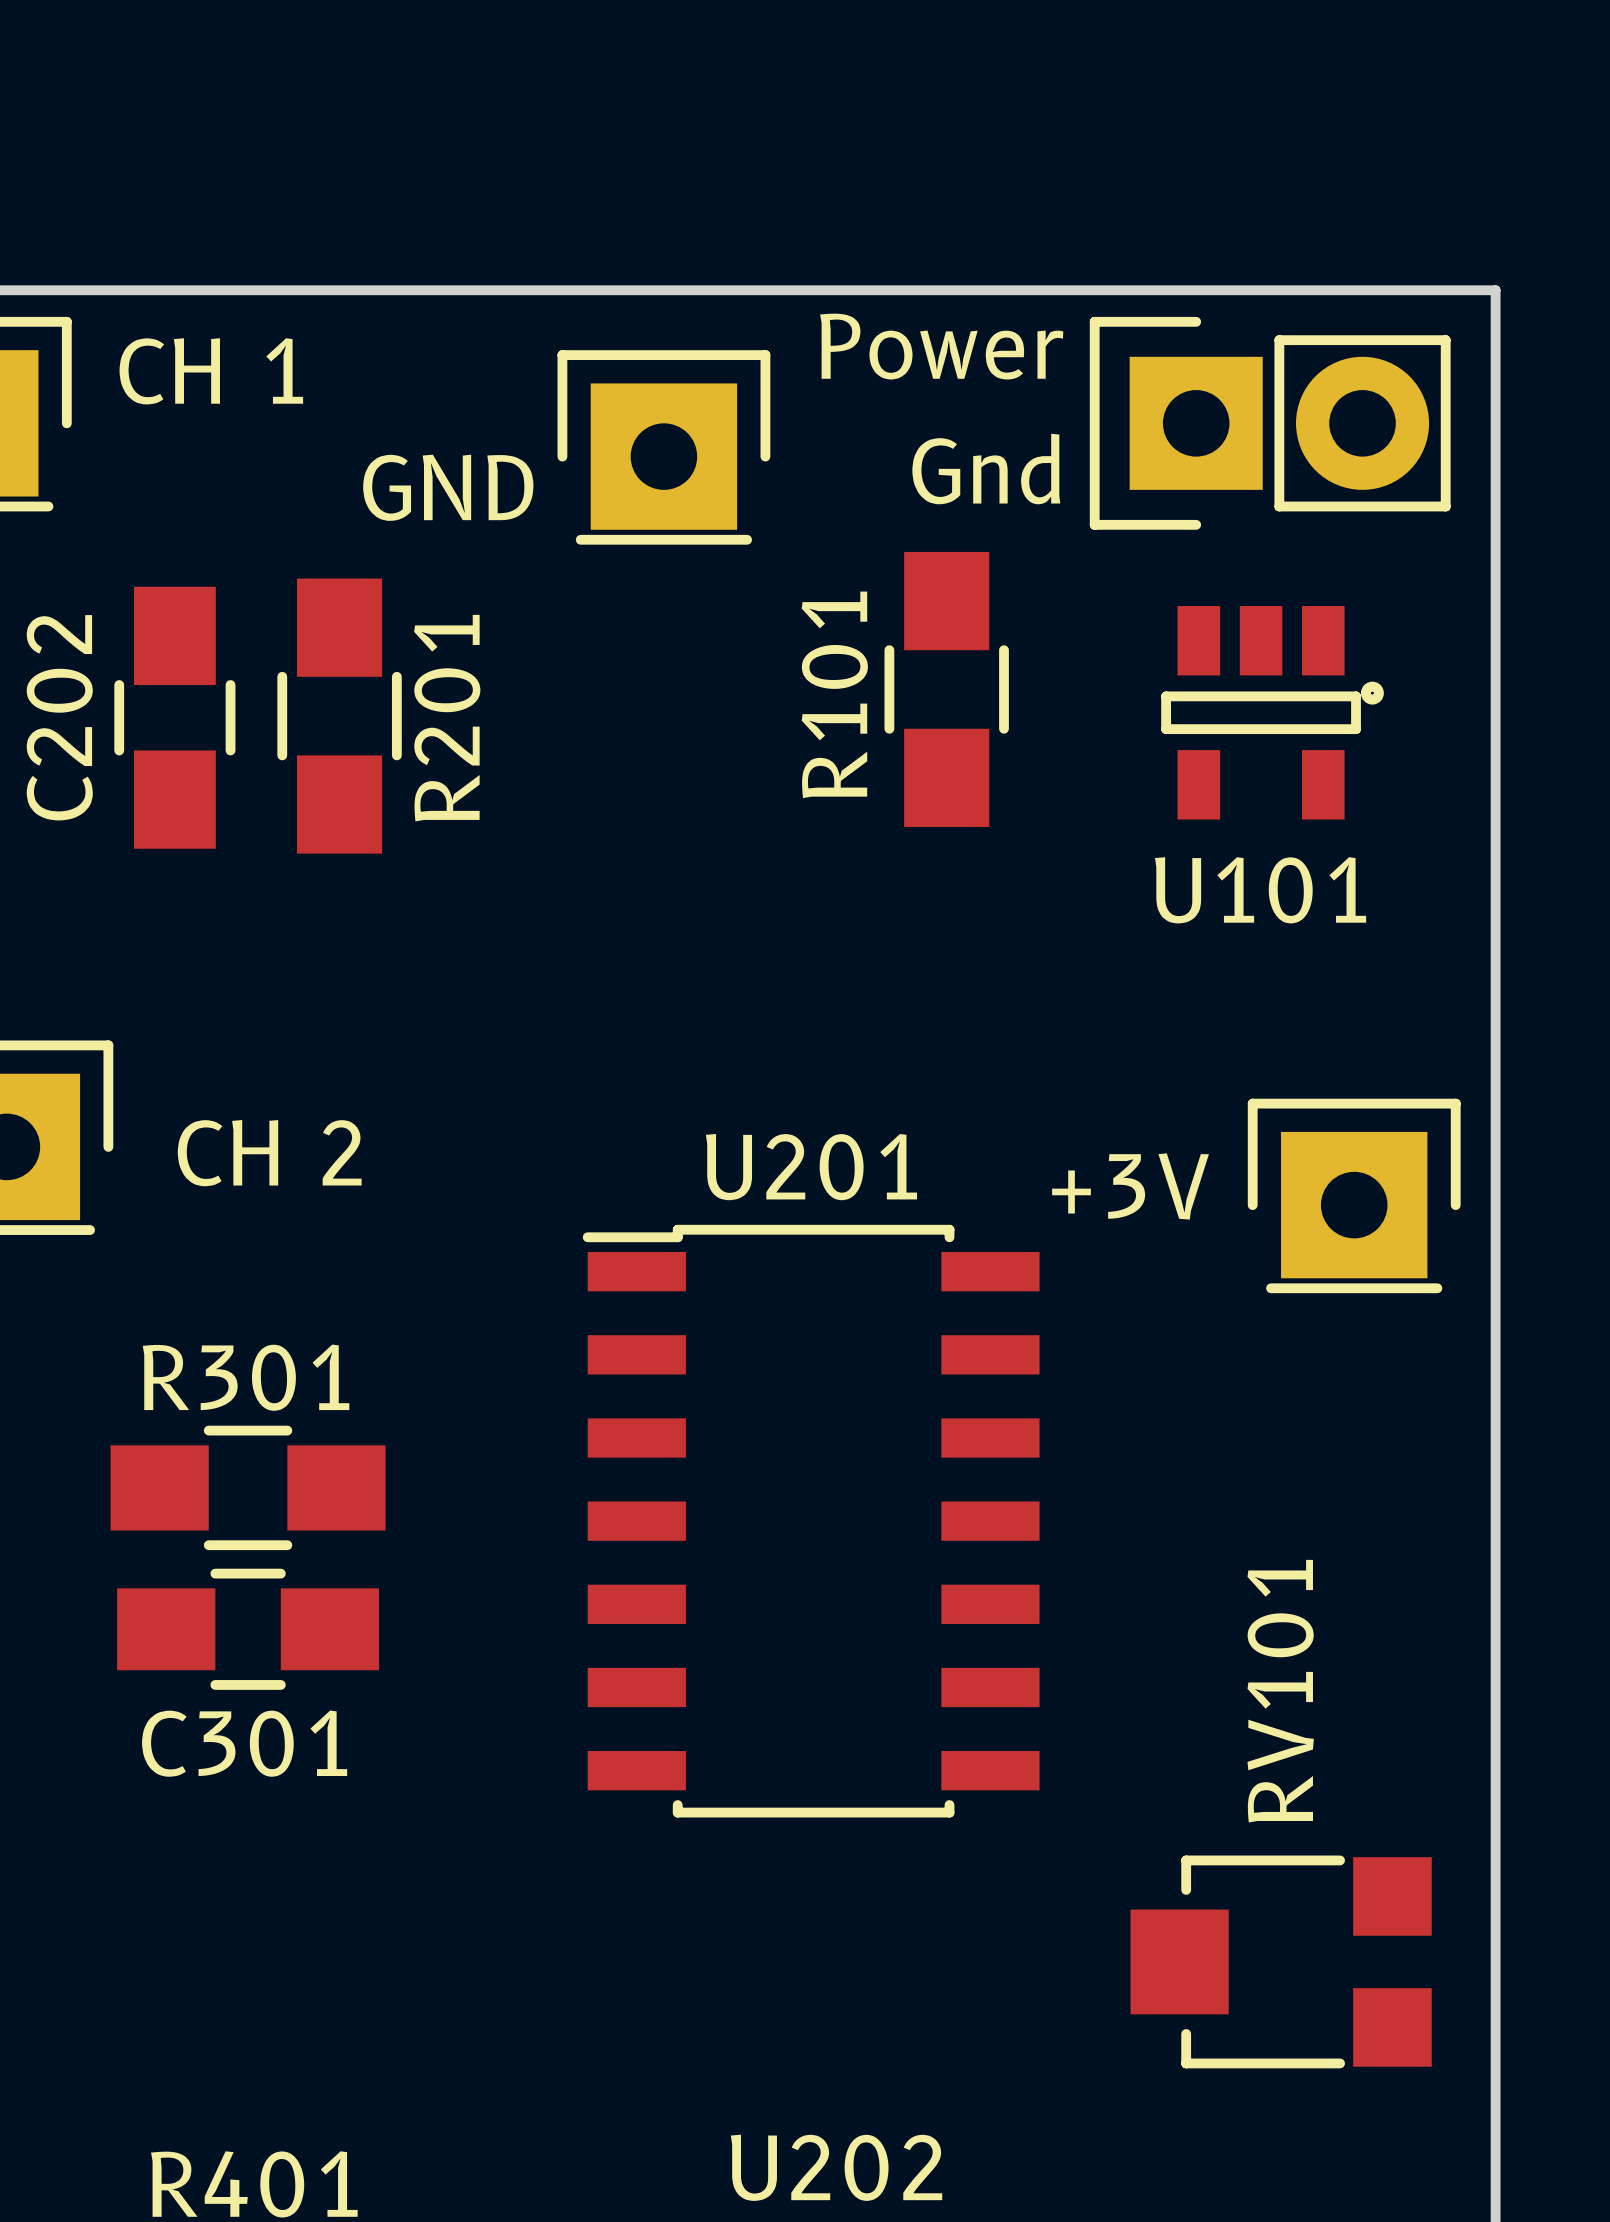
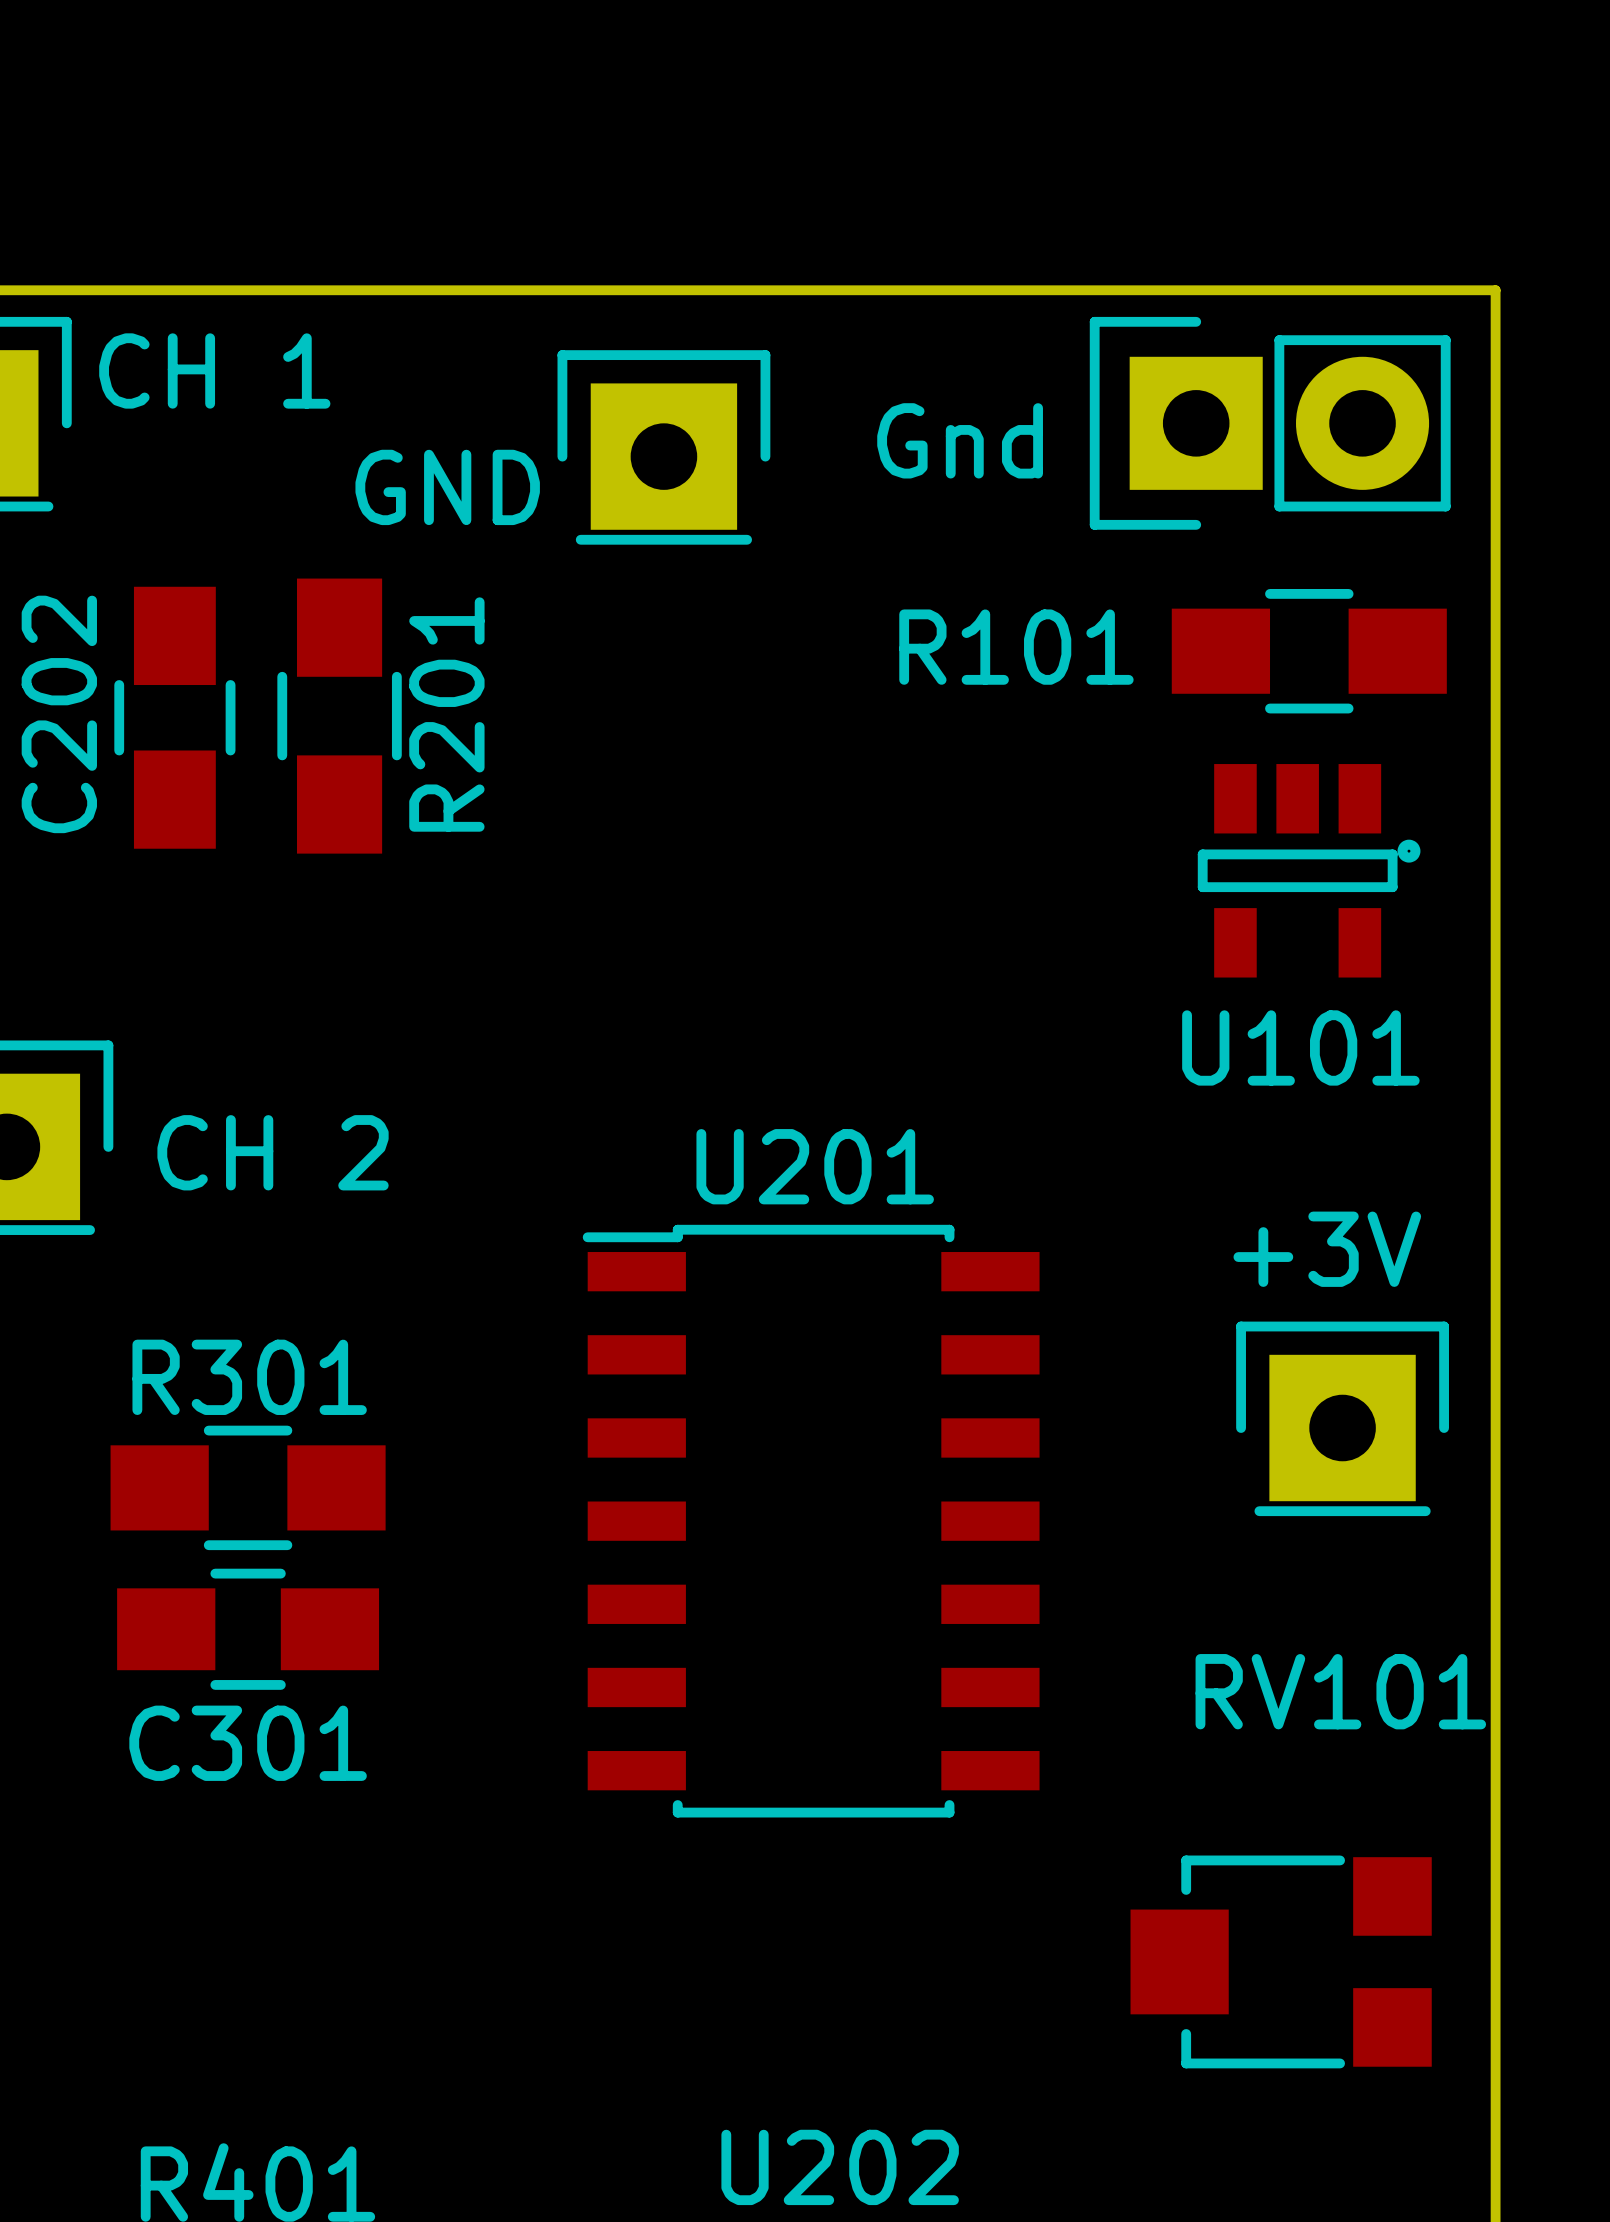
text: Power (941, 346) -> none
text position: Gnd (986, 468) -> Gnd (960, 440)
R101 rotation: 0° (946, 689) -> 90° clockwise (1309, 651)
R101 position: (946, 689) -> (1309, 651)
R101 name position: R101 (834, 694) -> R101 (1016, 647)
U101 position: (1272, 712) -> (1309, 870)
text position: +3V (1130, 1186) -> +3V (1327, 1249)
part position: (1354, 1195) -> (1342, 1418)
RV101 name rotation: 0° (1280, 1691) -> 90° clockwise (1340, 1691)

